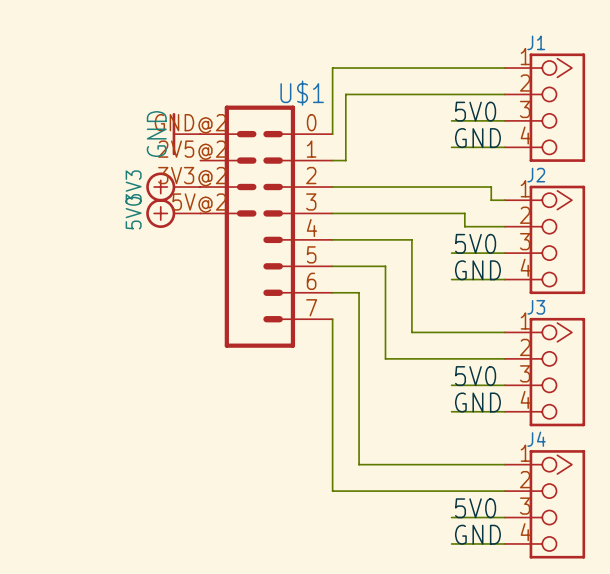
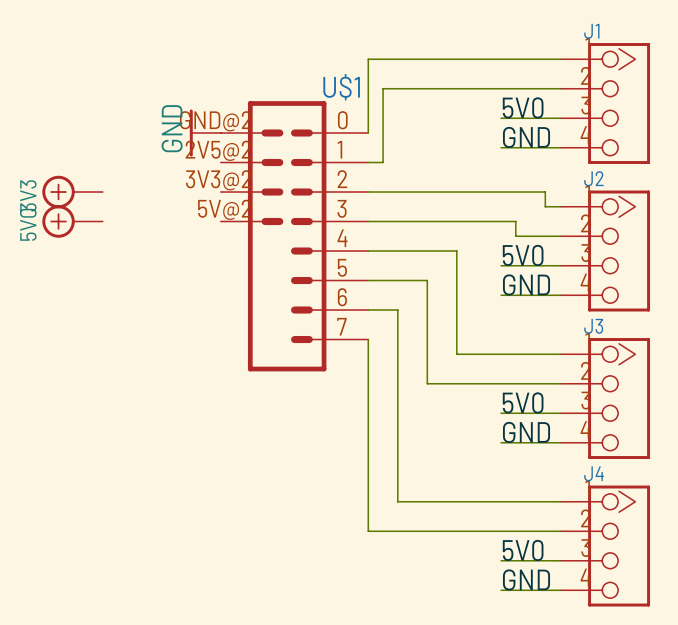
power symbol position: 3V3 (173, 187) -> 3V3 (72, 192)
power symbol position: 5V0 (173, 213) -> 5V0 (72, 221)

